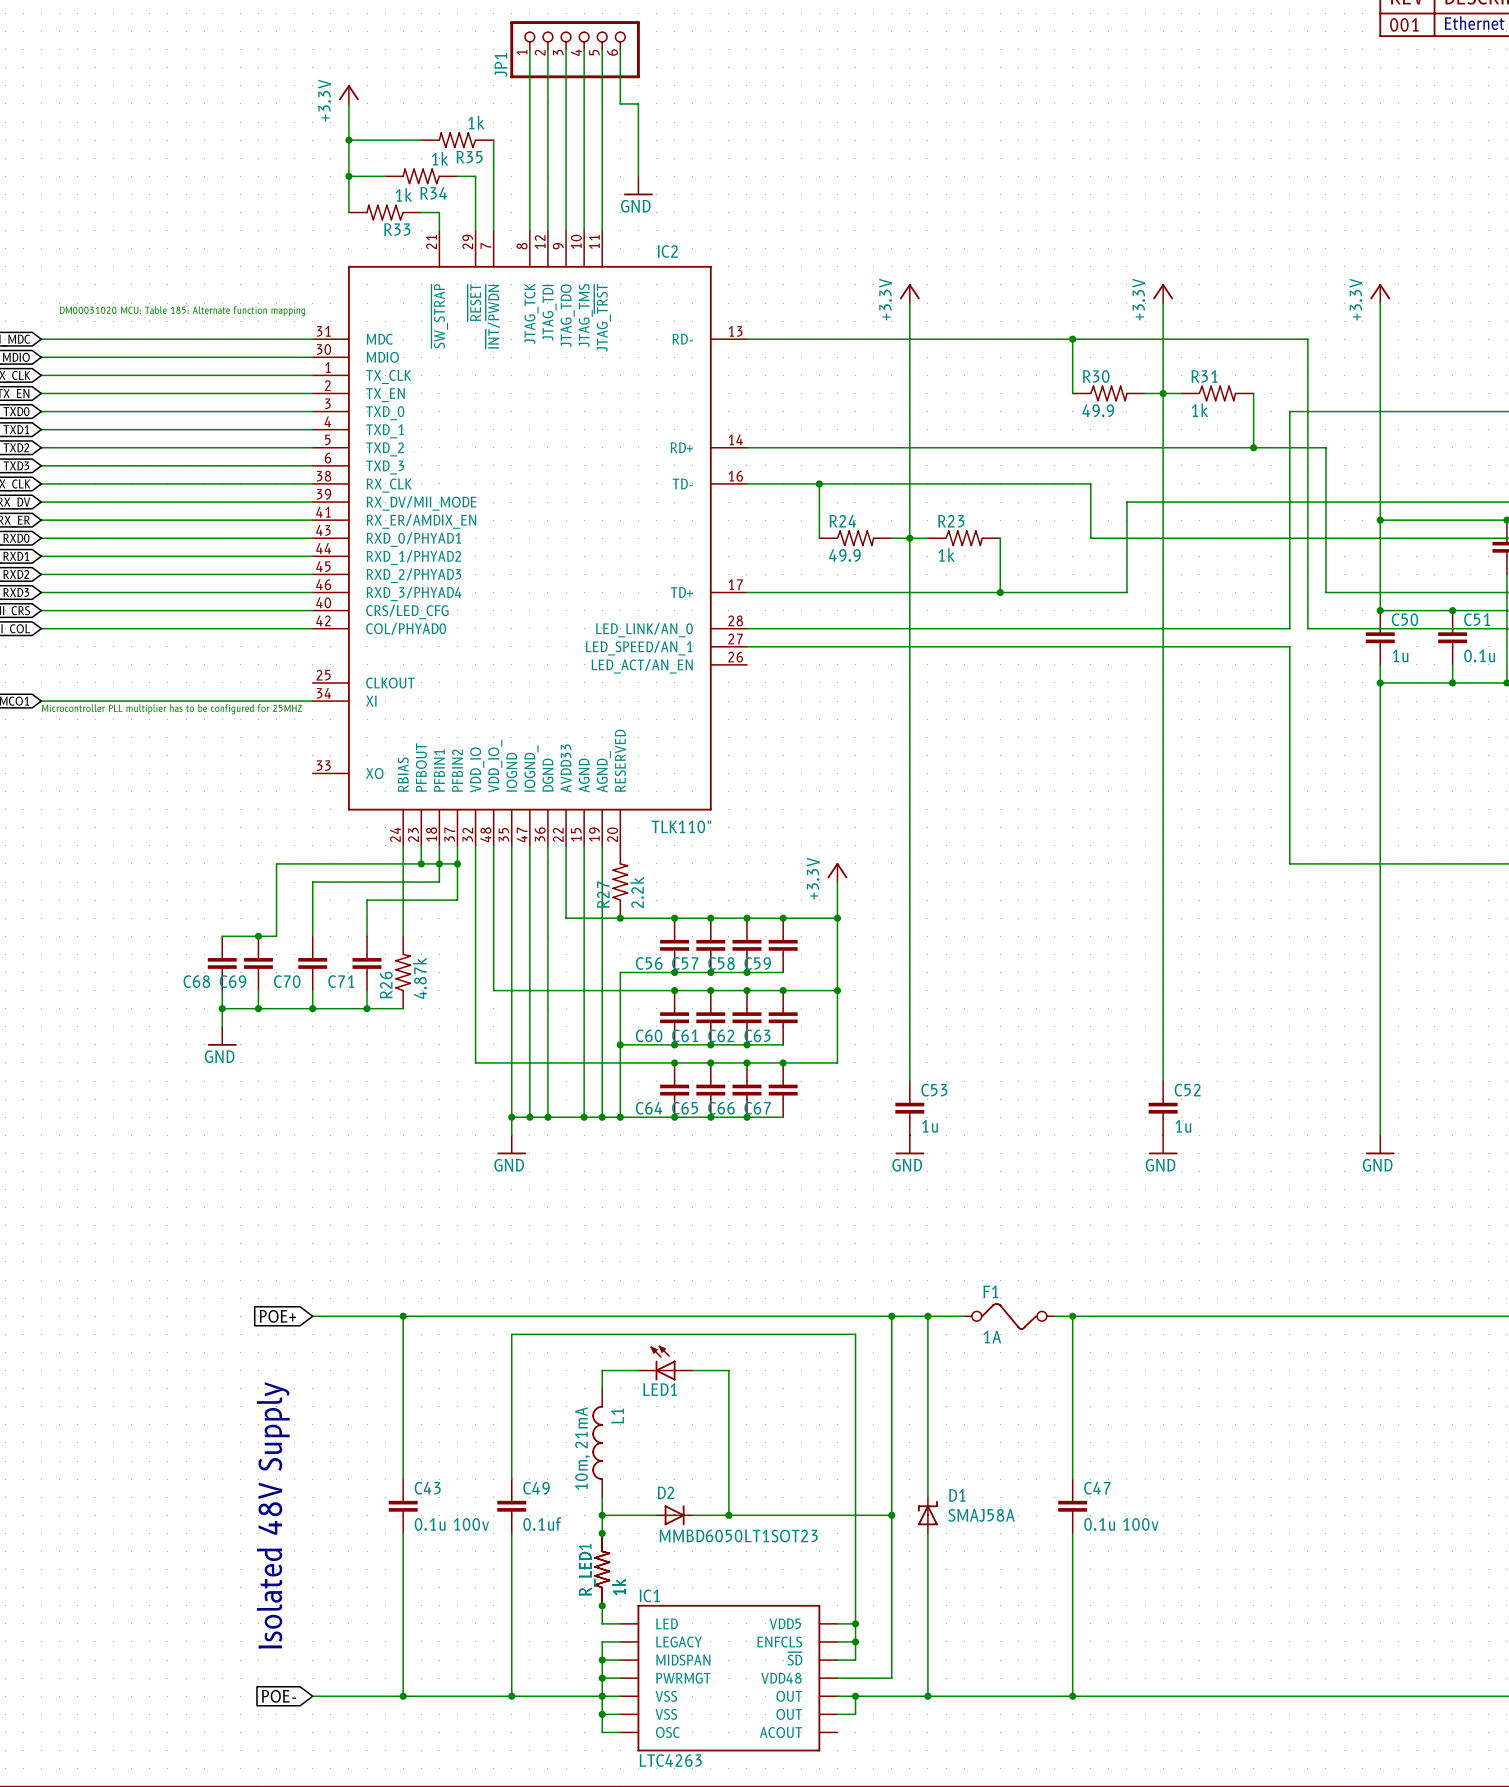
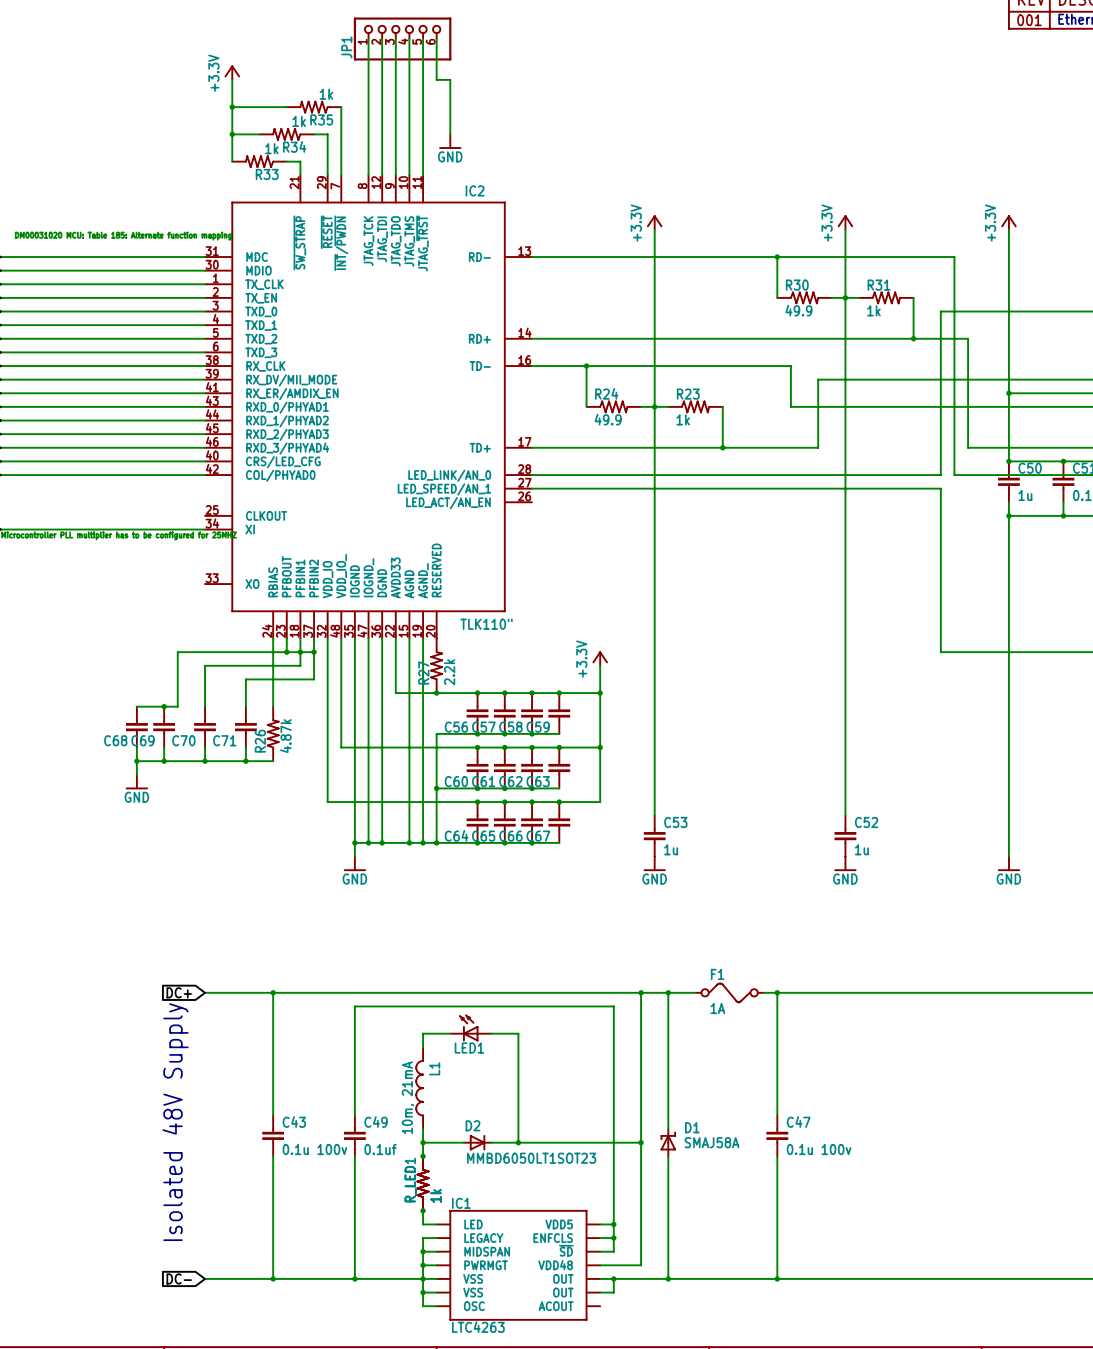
global label: POE+ (277, 1316) -> DC+ (179, 992)
global label: POE- (278, 1696) -> DC- (179, 1278)

